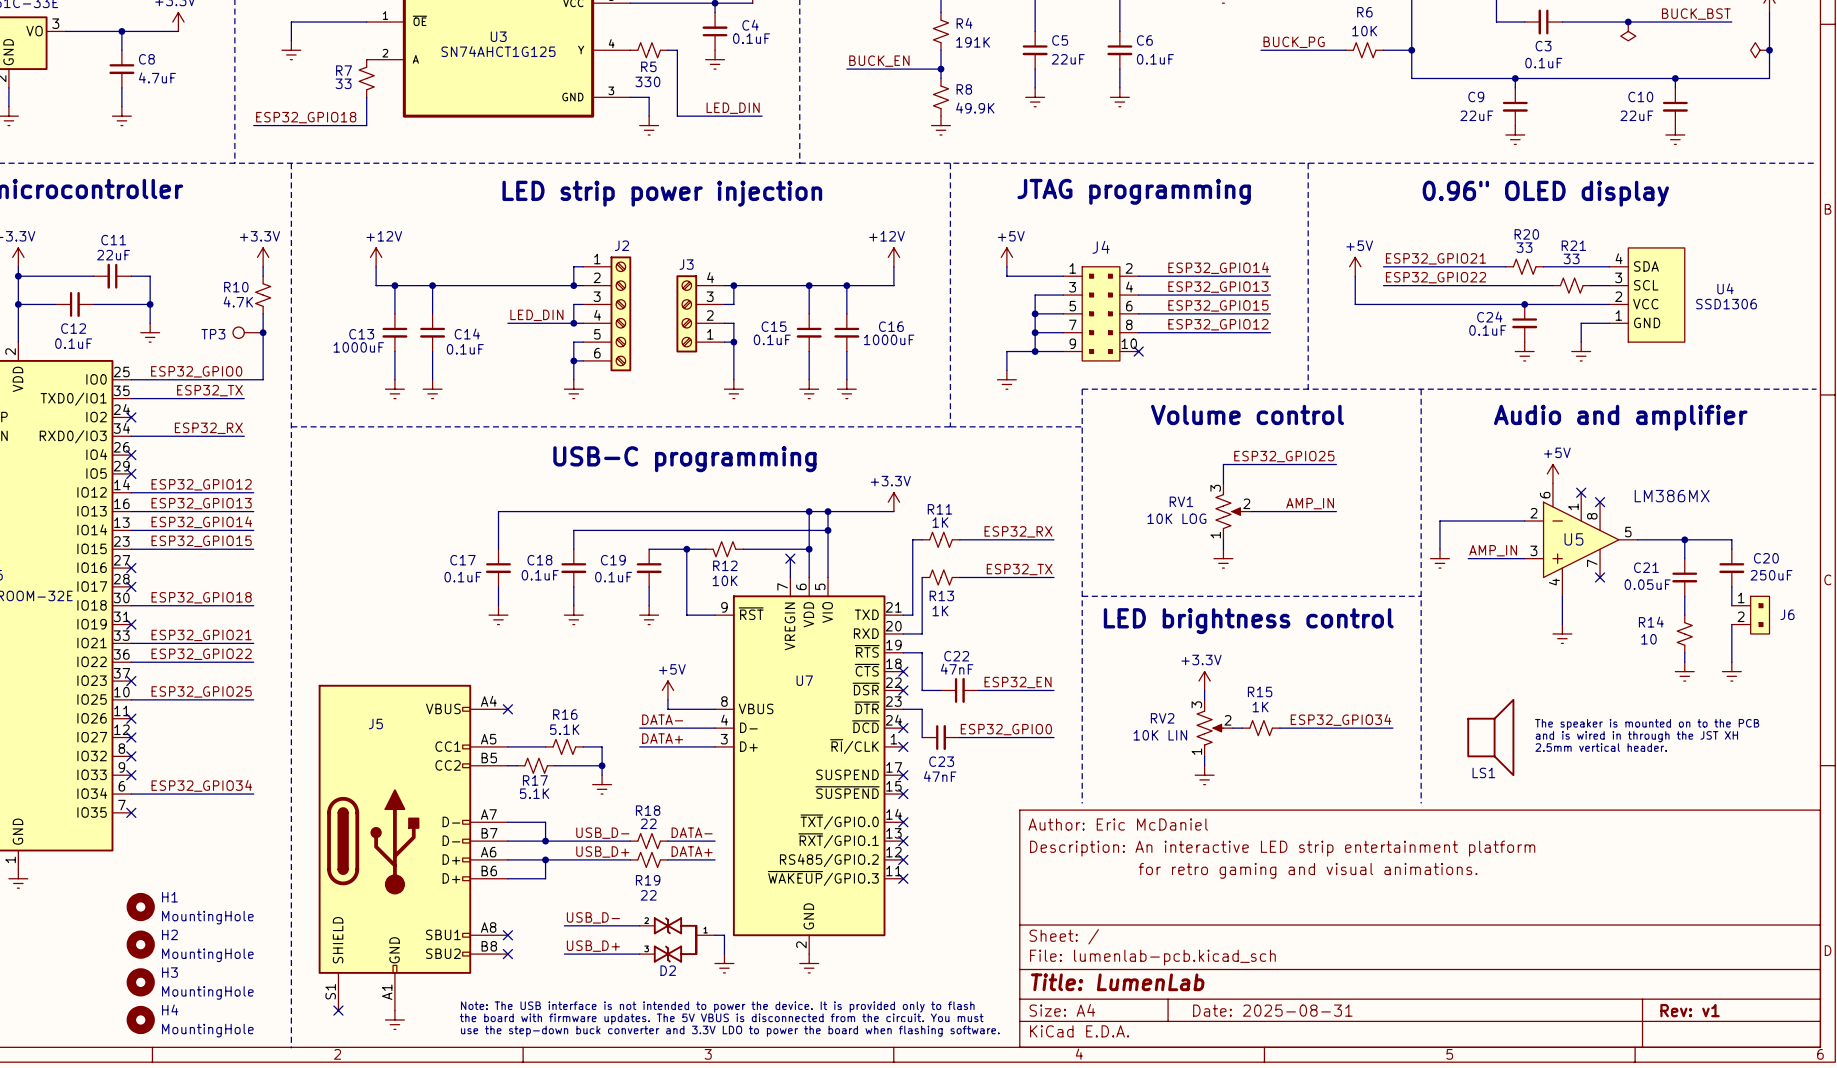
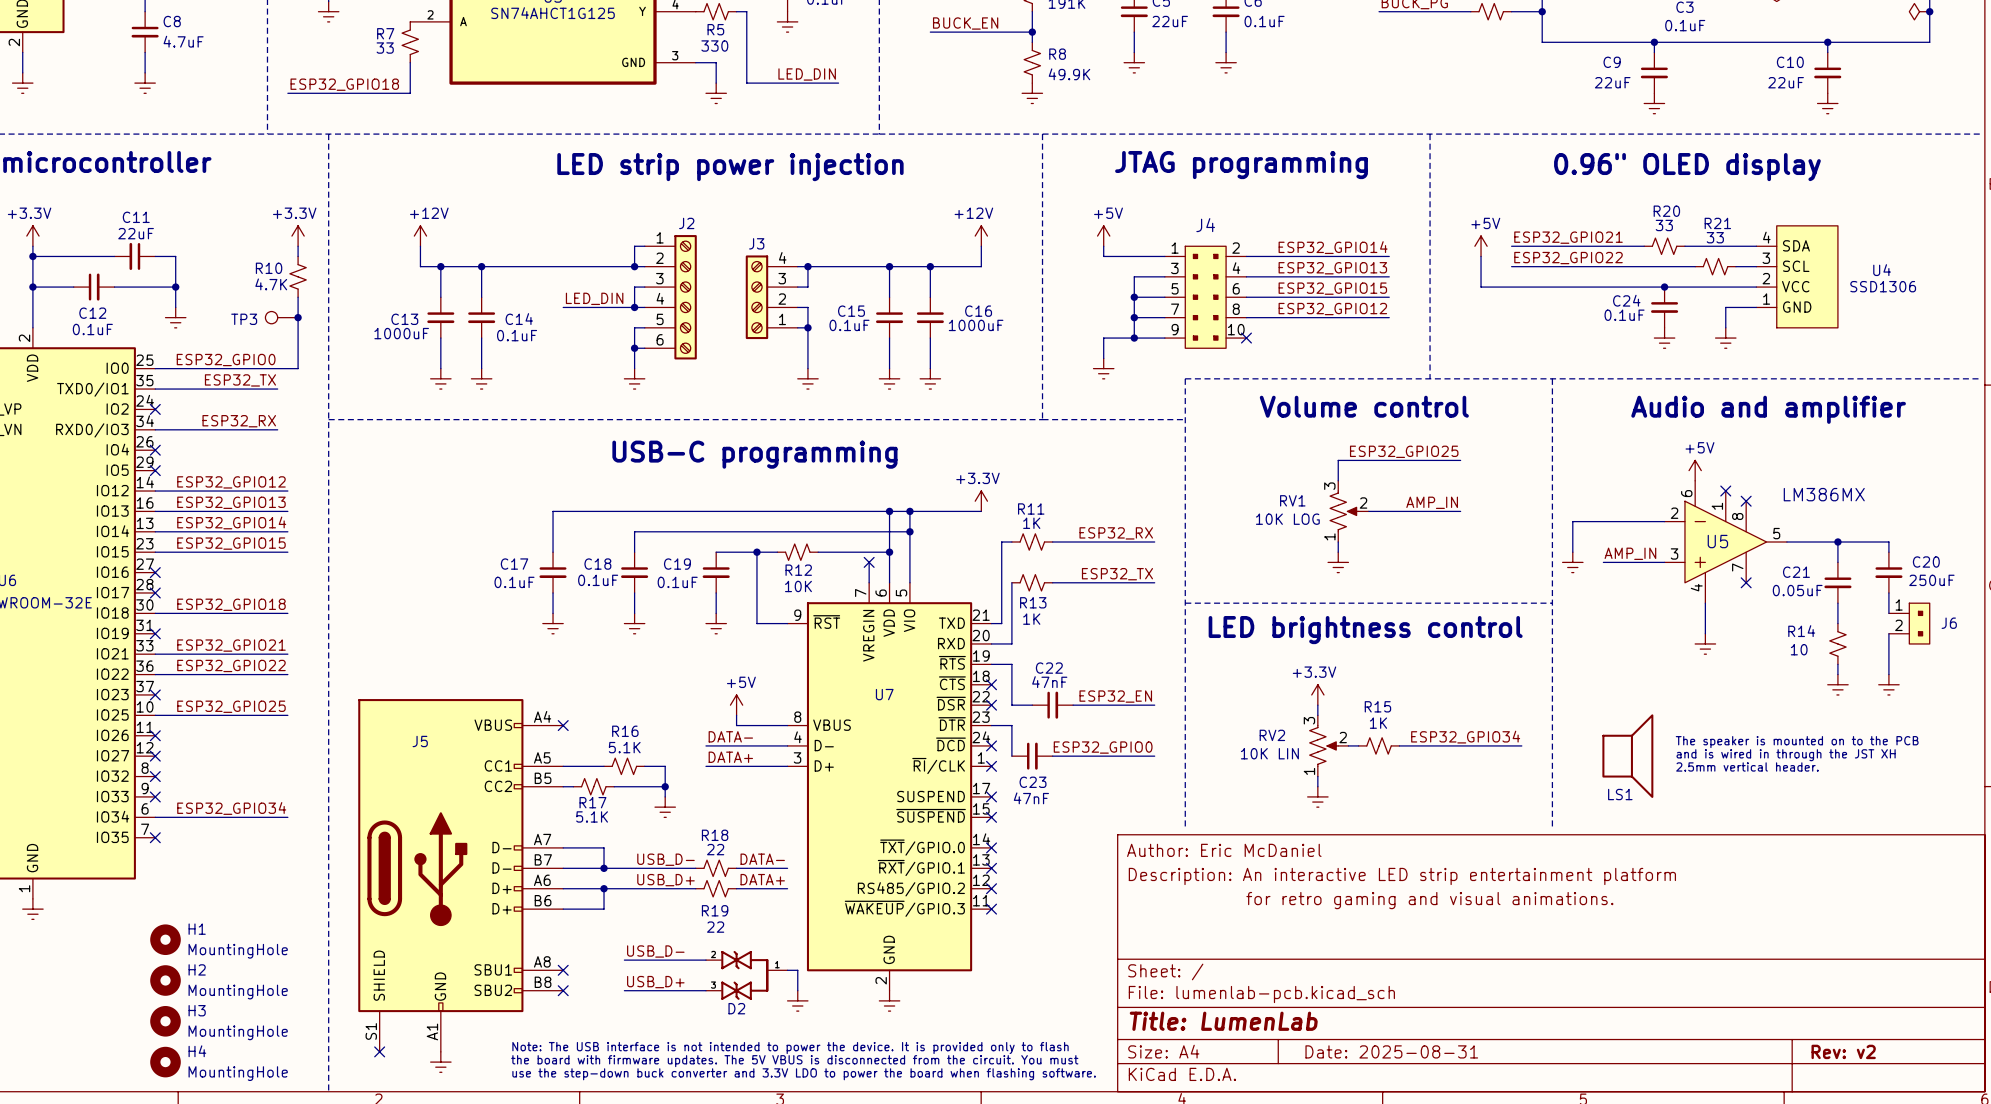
title block: Rev: v1 (1690, 1010) -> Rev: v2 (1843, 1051)

